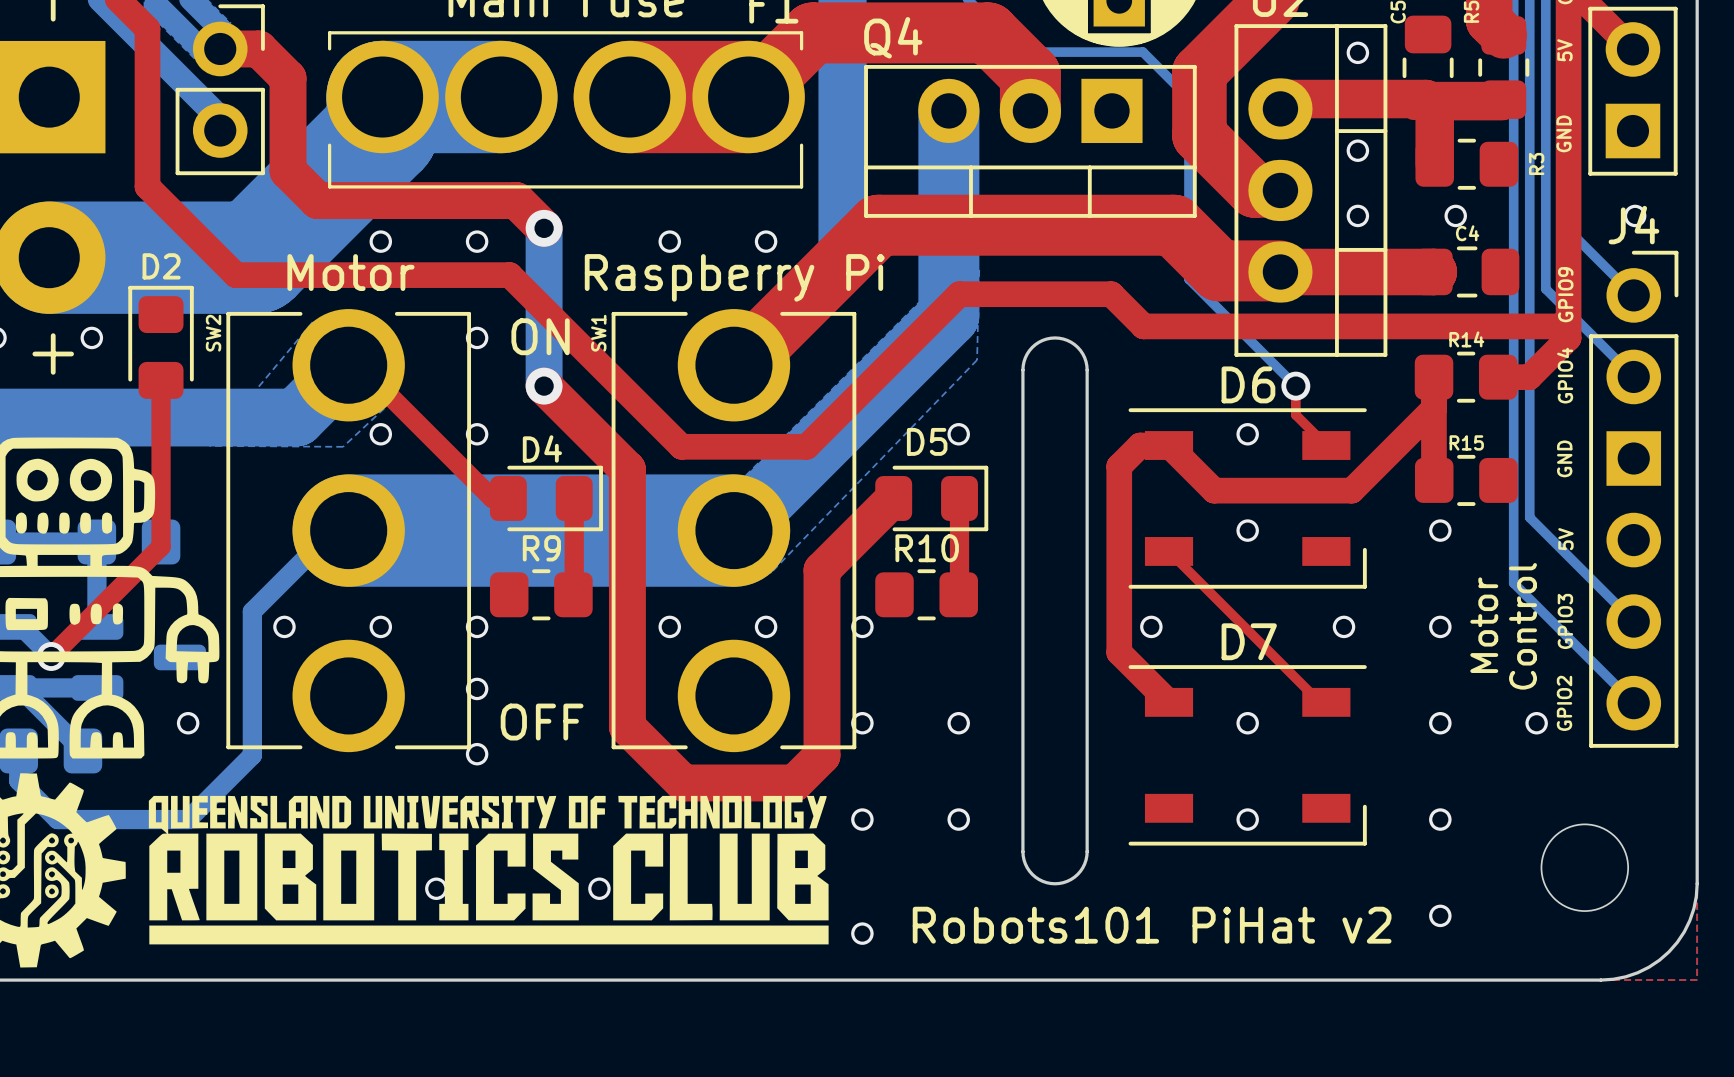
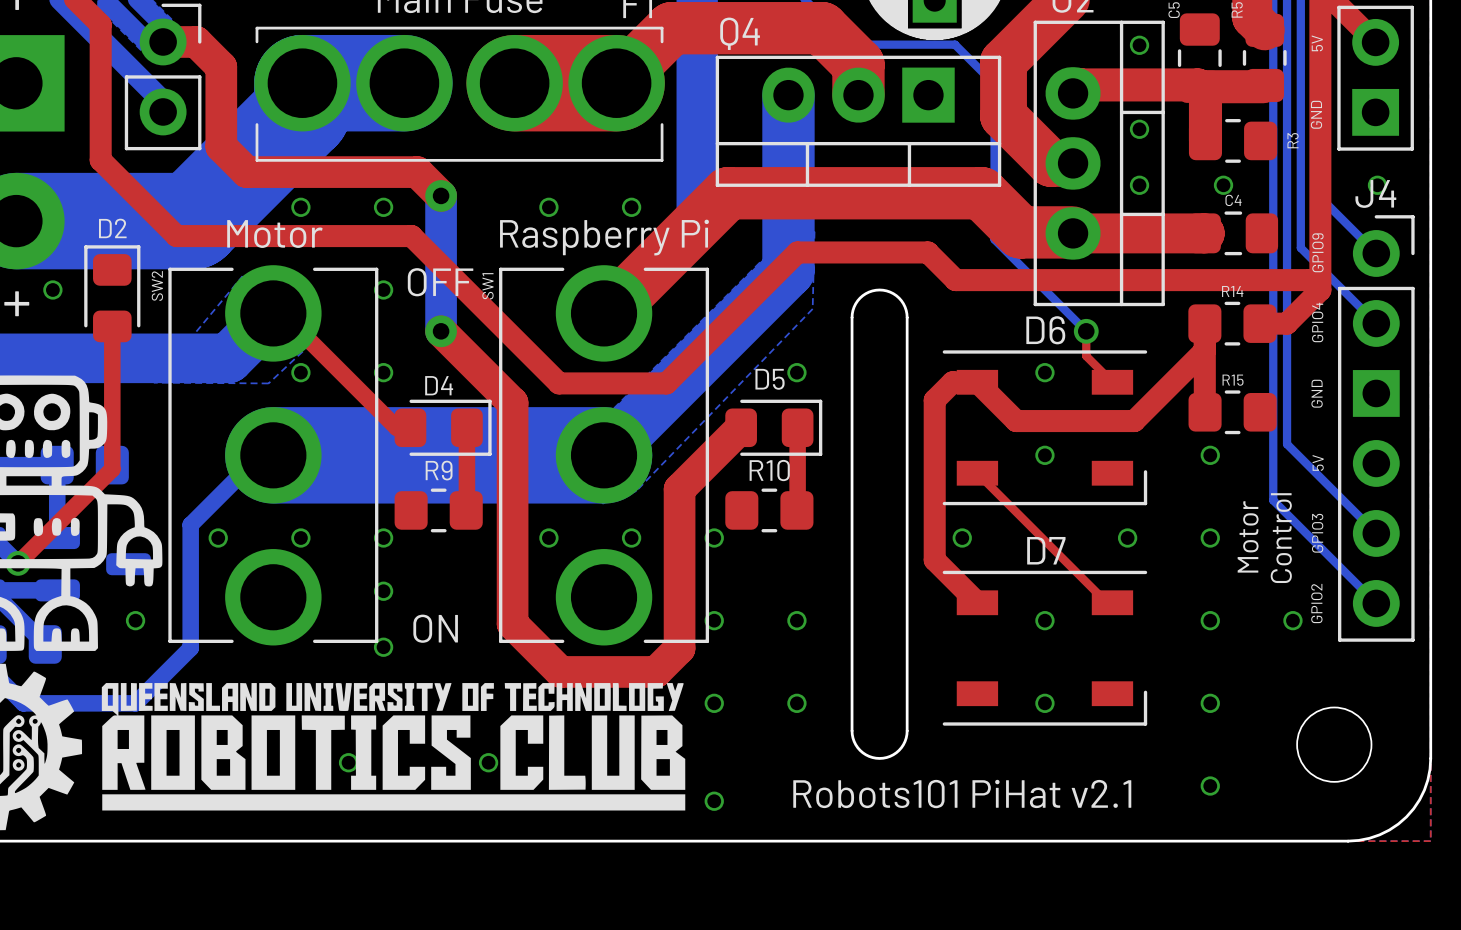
text: ON (540, 336) -> OFF (440, 282)
text: OFF (542, 722) -> ON (435, 628)
text: Robots101 PiHat v2 (1152, 925) -> Robots101 PiHat v2.1 (962, 794)

